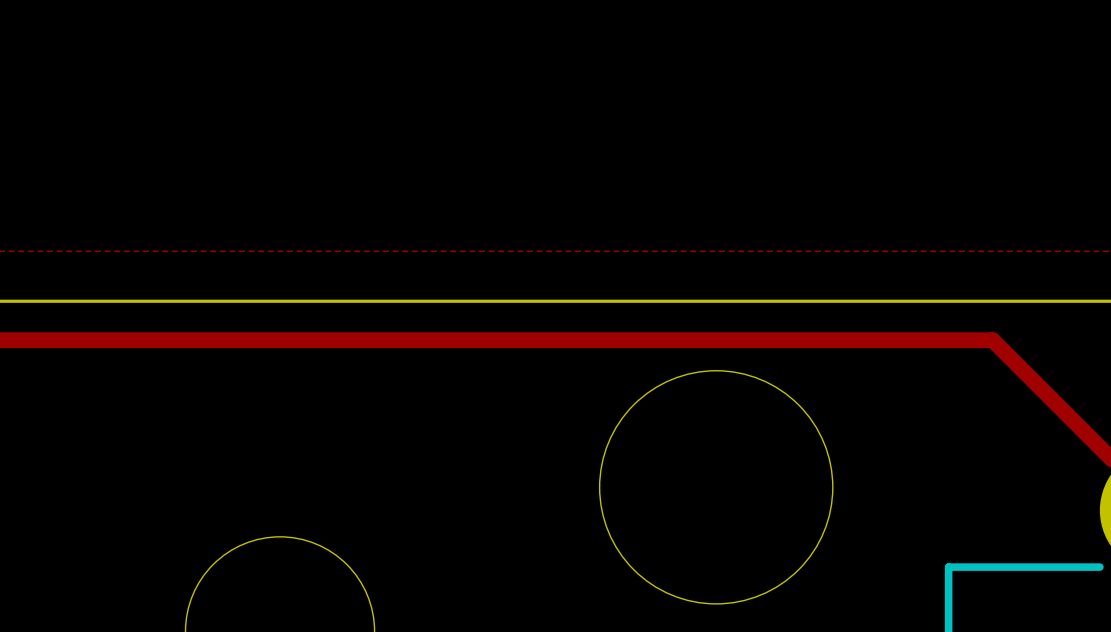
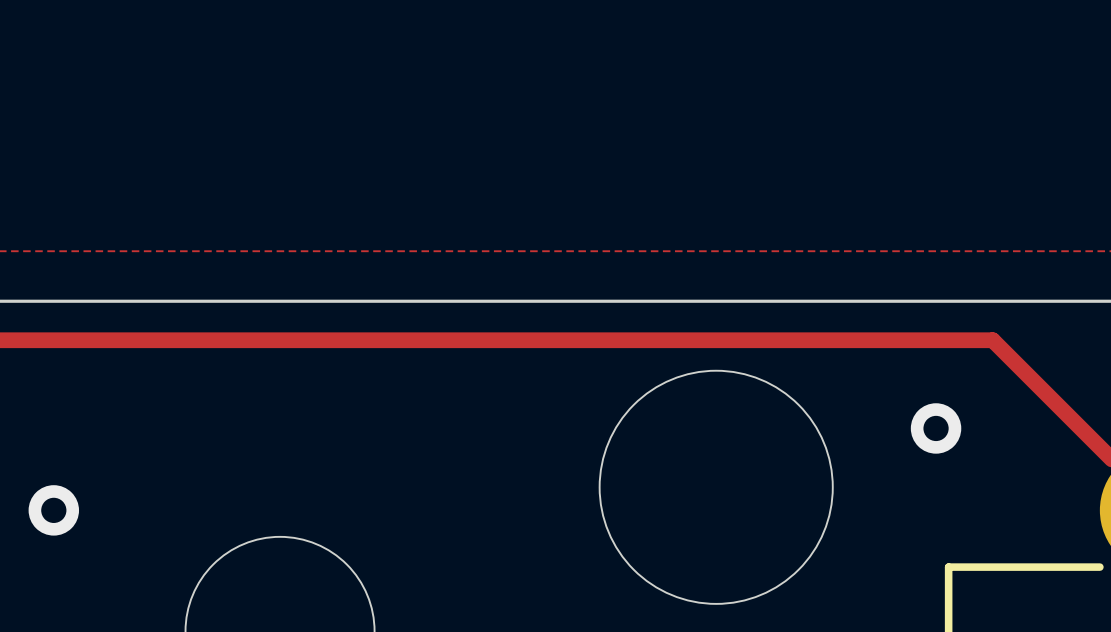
via: none -> (936, 428)
via: none -> (53, 510)

